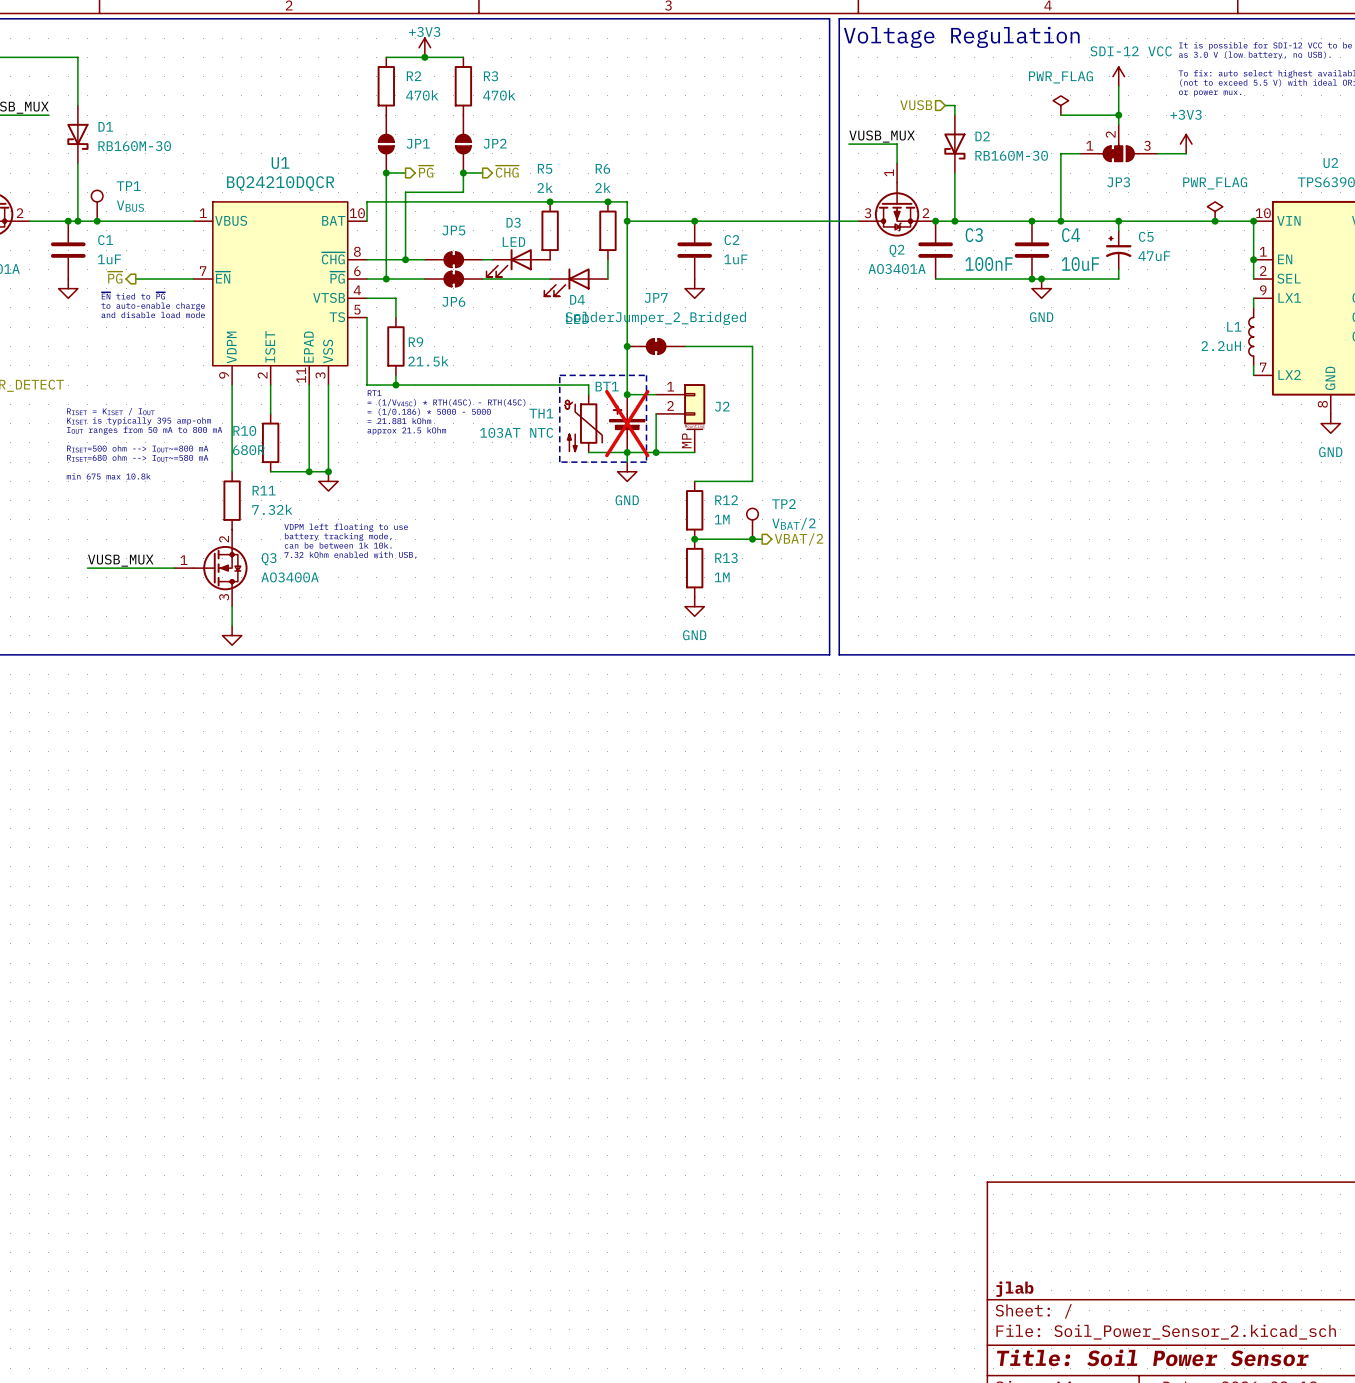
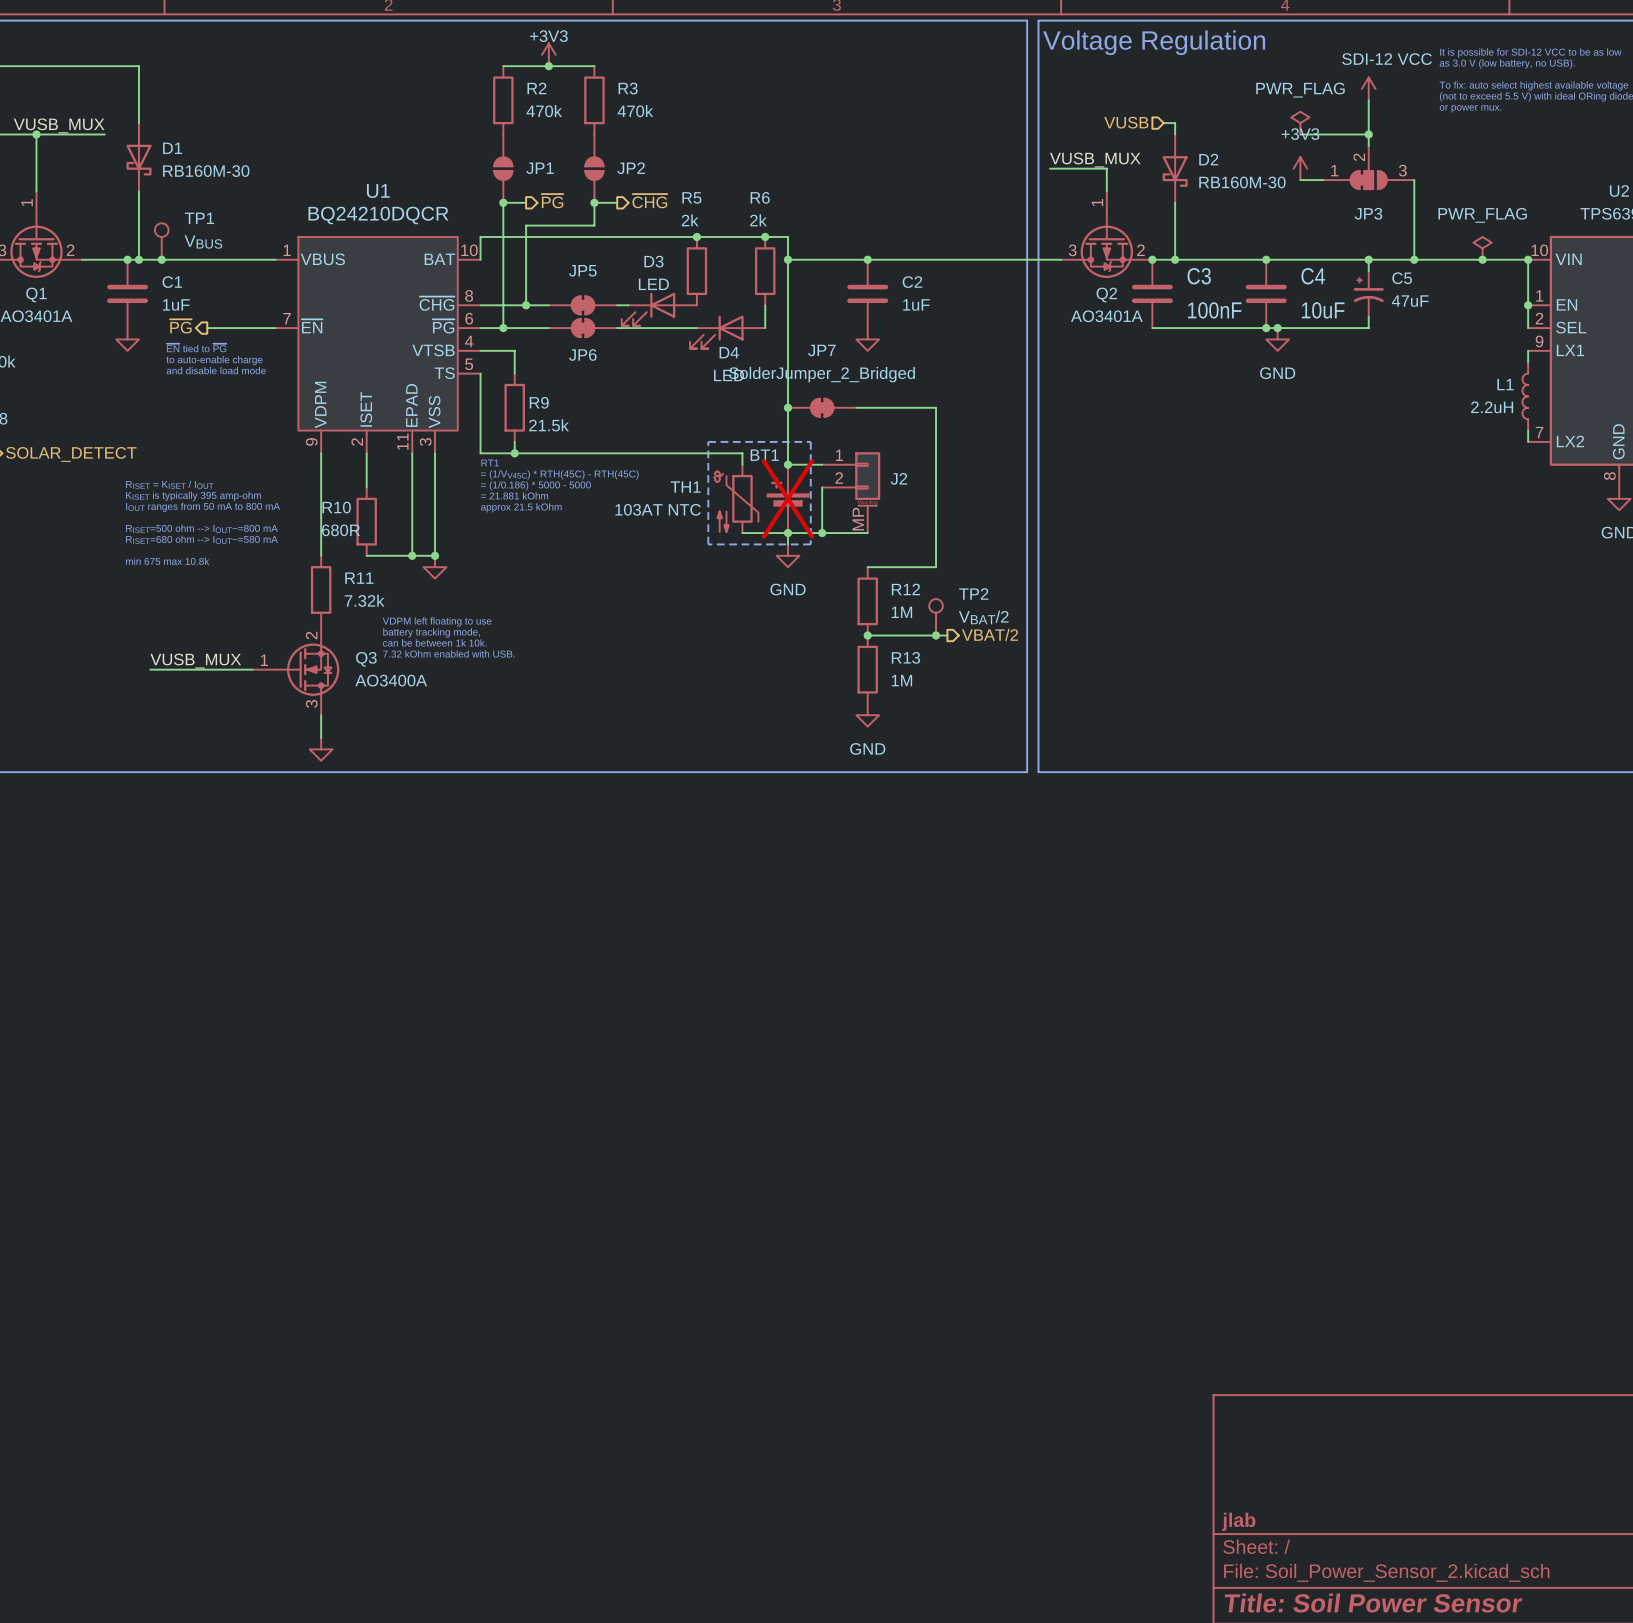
power symbol position: +3V3 (1186, 144) -> +3V3 (1300, 168)
wire: (1060, 153) (1060, 221) -> none
wire: (1157, 153) (1186, 153) -> (1414, 180) (1414, 259)
junction: (1060, 221) -> none
junction: none -> (1414, 259)

